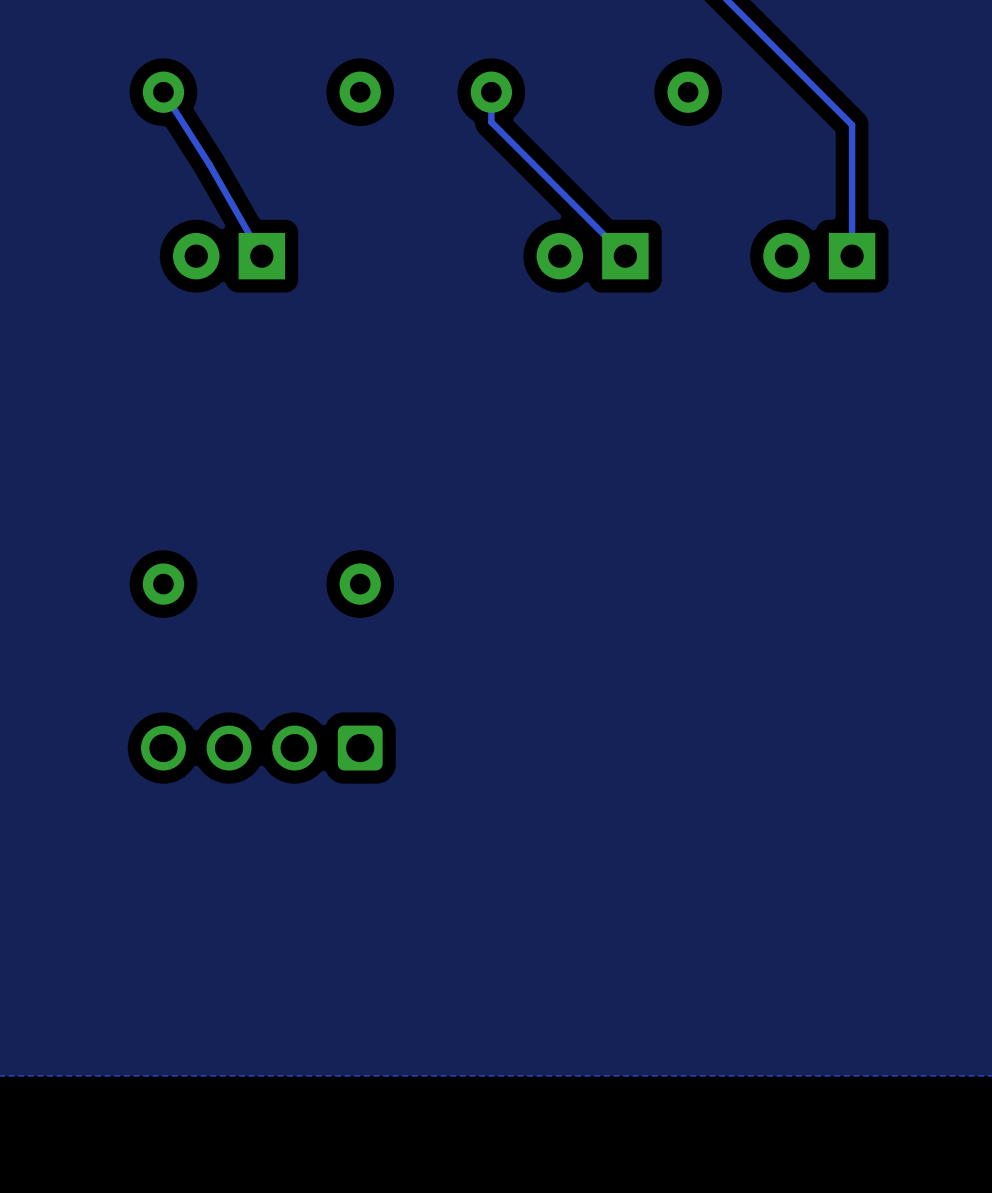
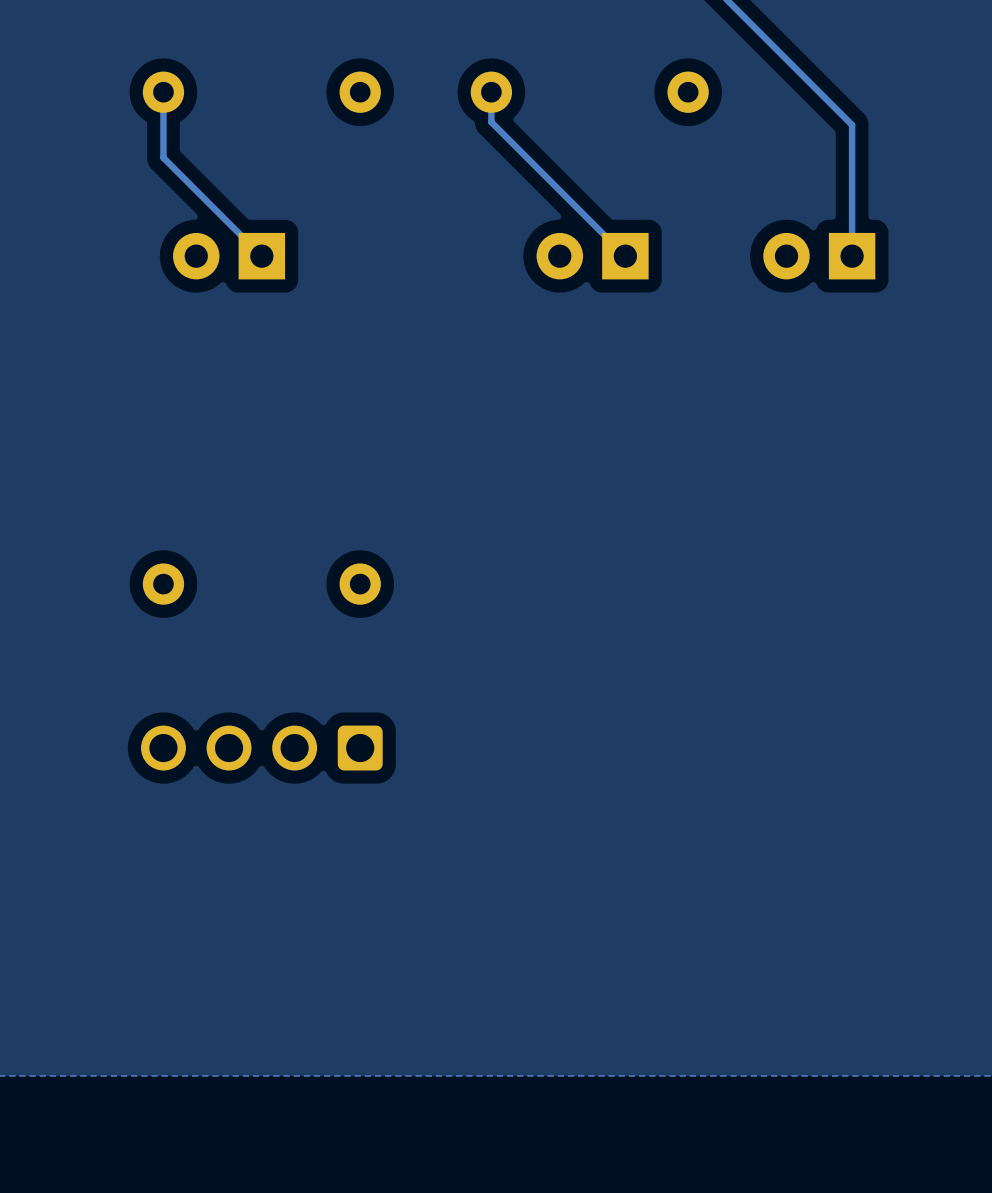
track: (163, 92) (209, 164) (261, 256) -> (163, 92) (163, 157) (261, 256)

